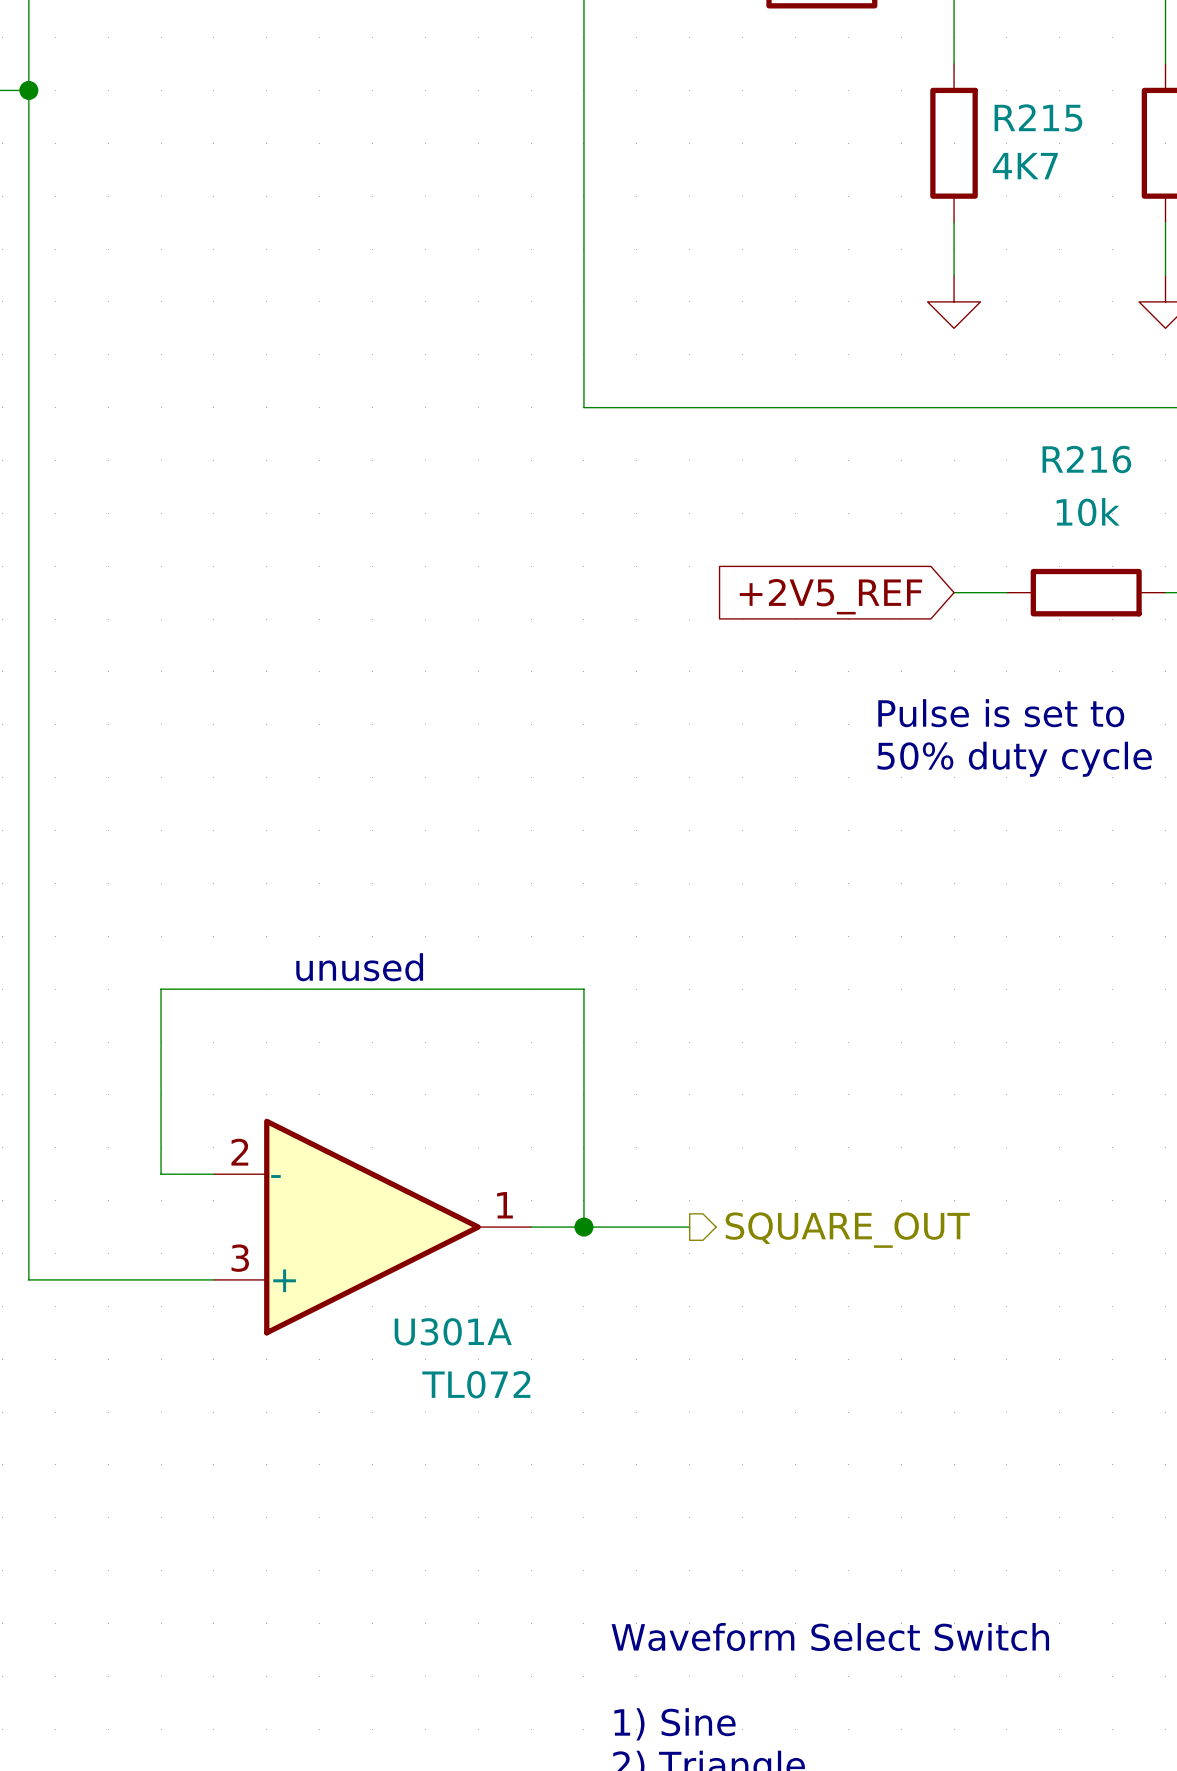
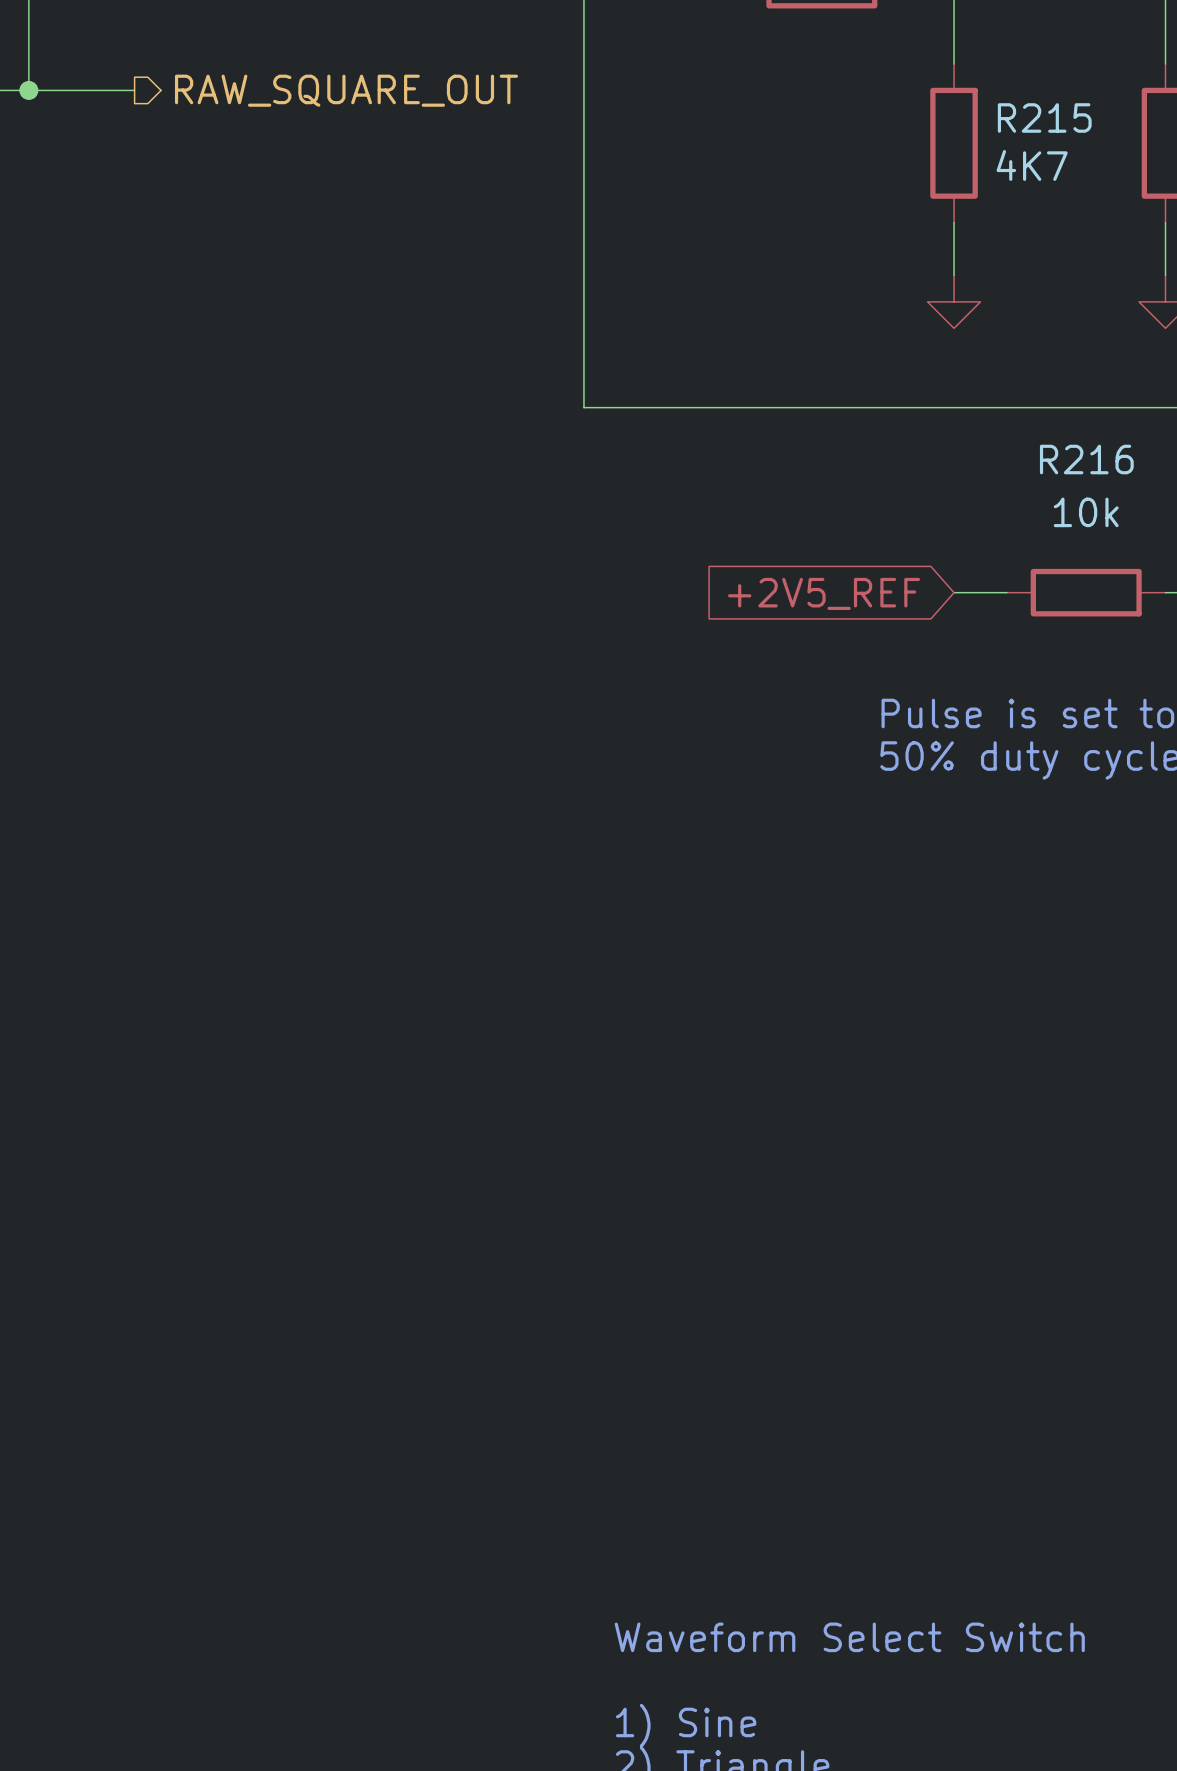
wire: (28, 90) (28, 1279) (213, 1279) -> (28, 90) (134, 90)
hierarchical label: none -> RAW_SQUARE_OUT (346, 90)
text: unused (359, 967) -> none
wire: (213, 1174) (161, 1174) (161, 989) (583, 989) (583, 1227) -> none
U301A: TL072 (372, 1227) -> none
wire: (531, 1227) (689, 1227) -> none
junction: (583, 1227) -> none
hierarchical label: SQUARE_OUT (847, 1230) -> none

